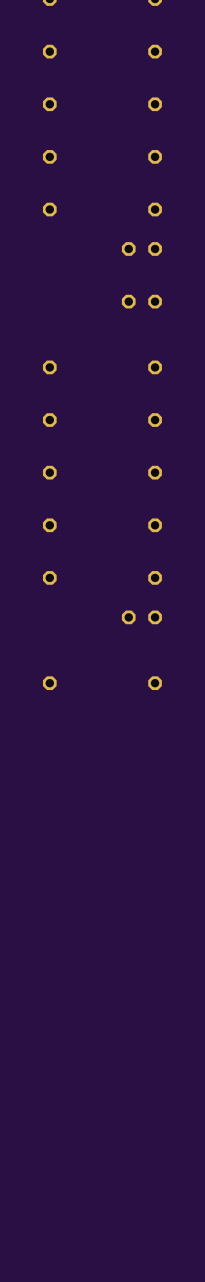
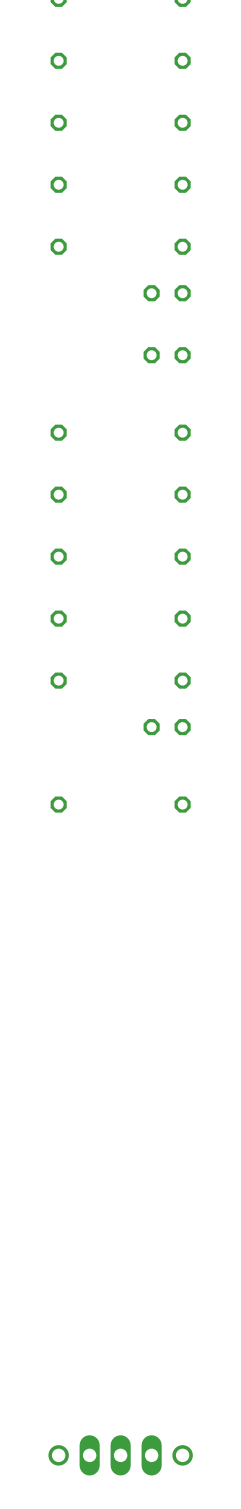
part: none -> (120, 1455)

